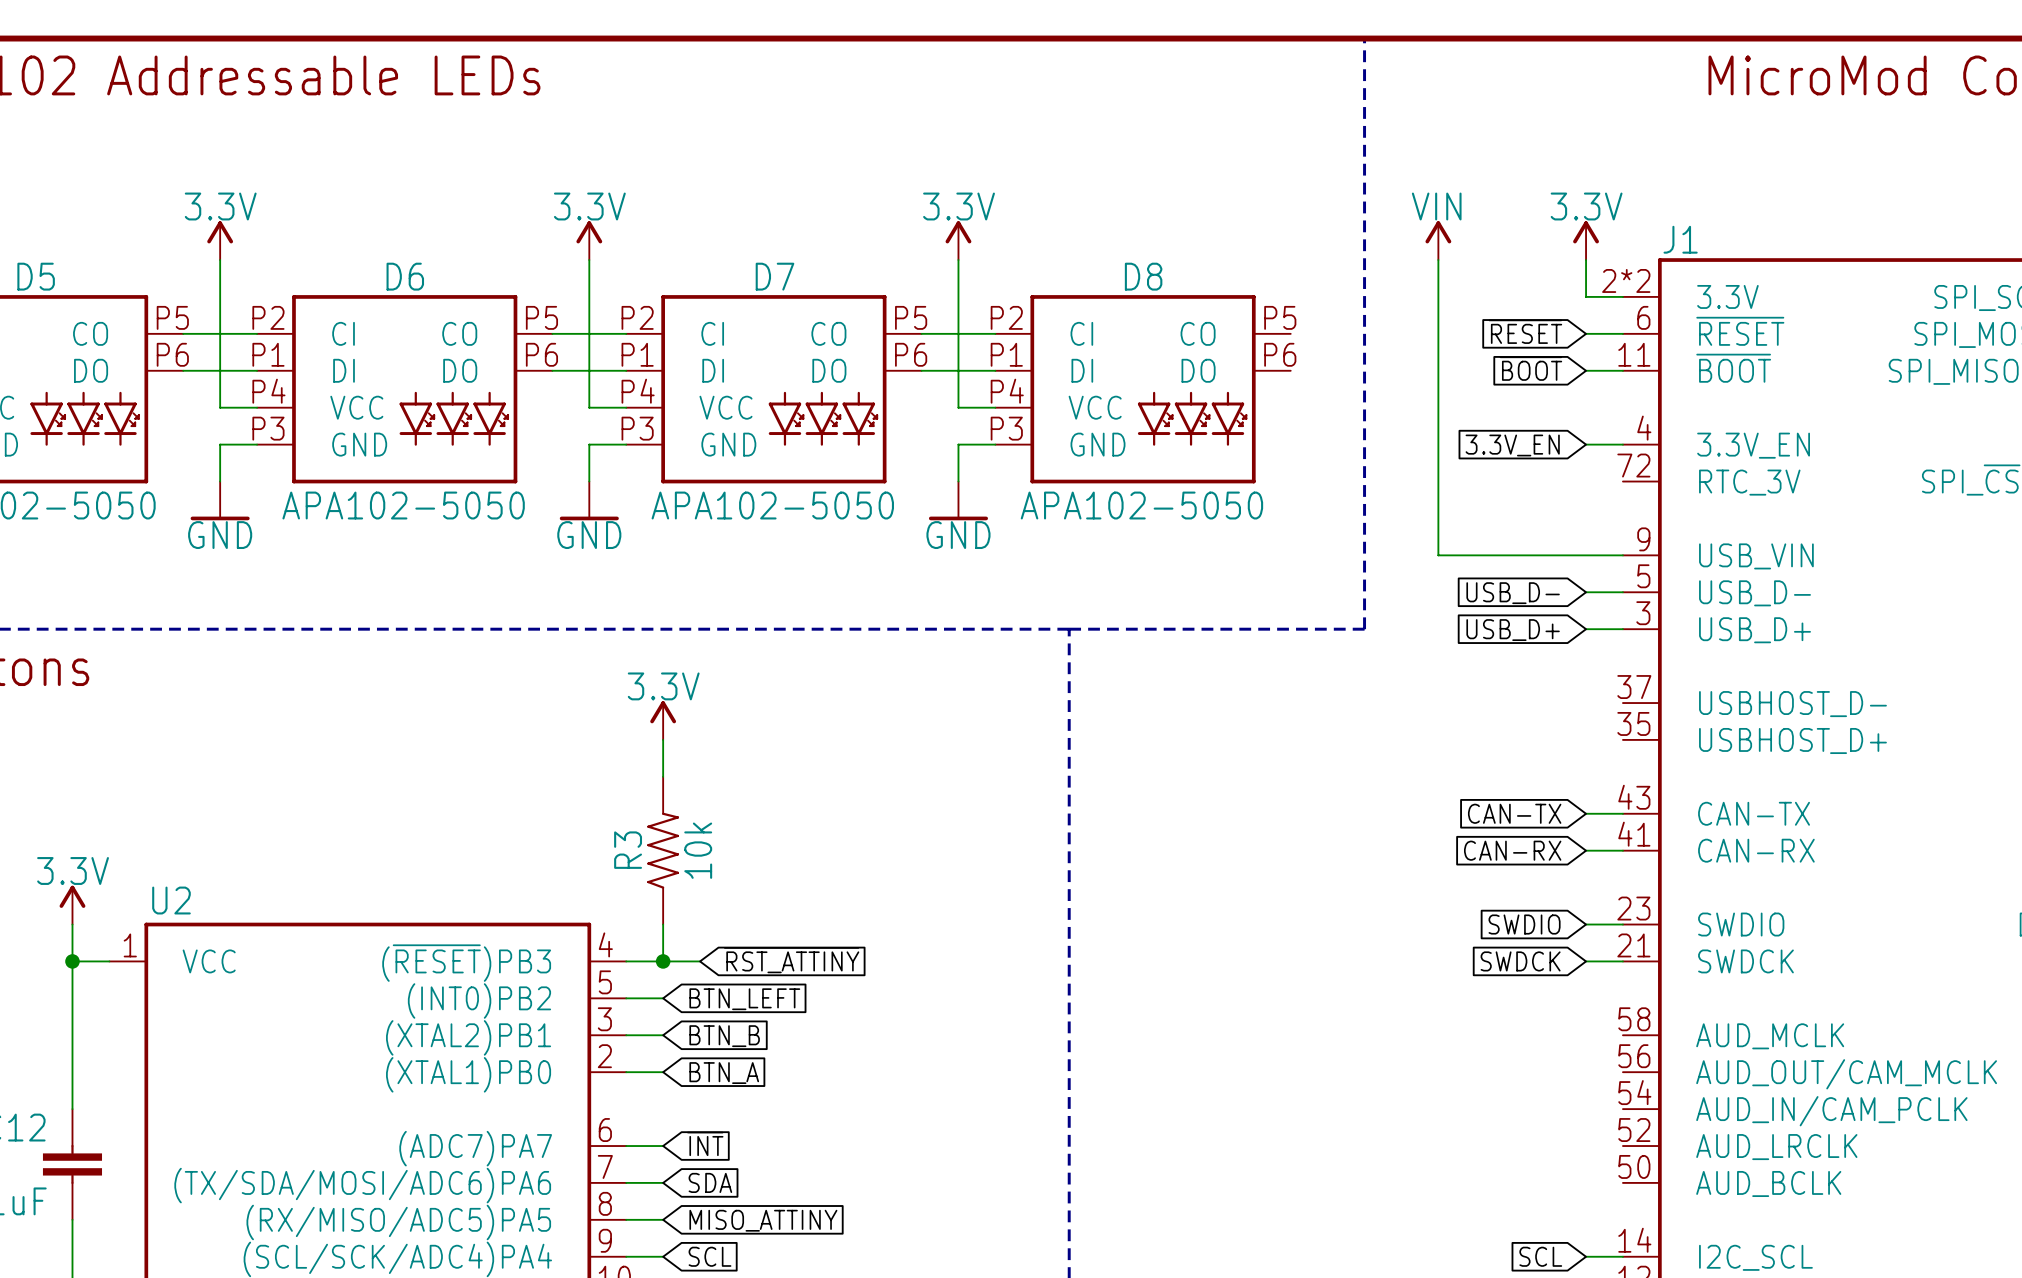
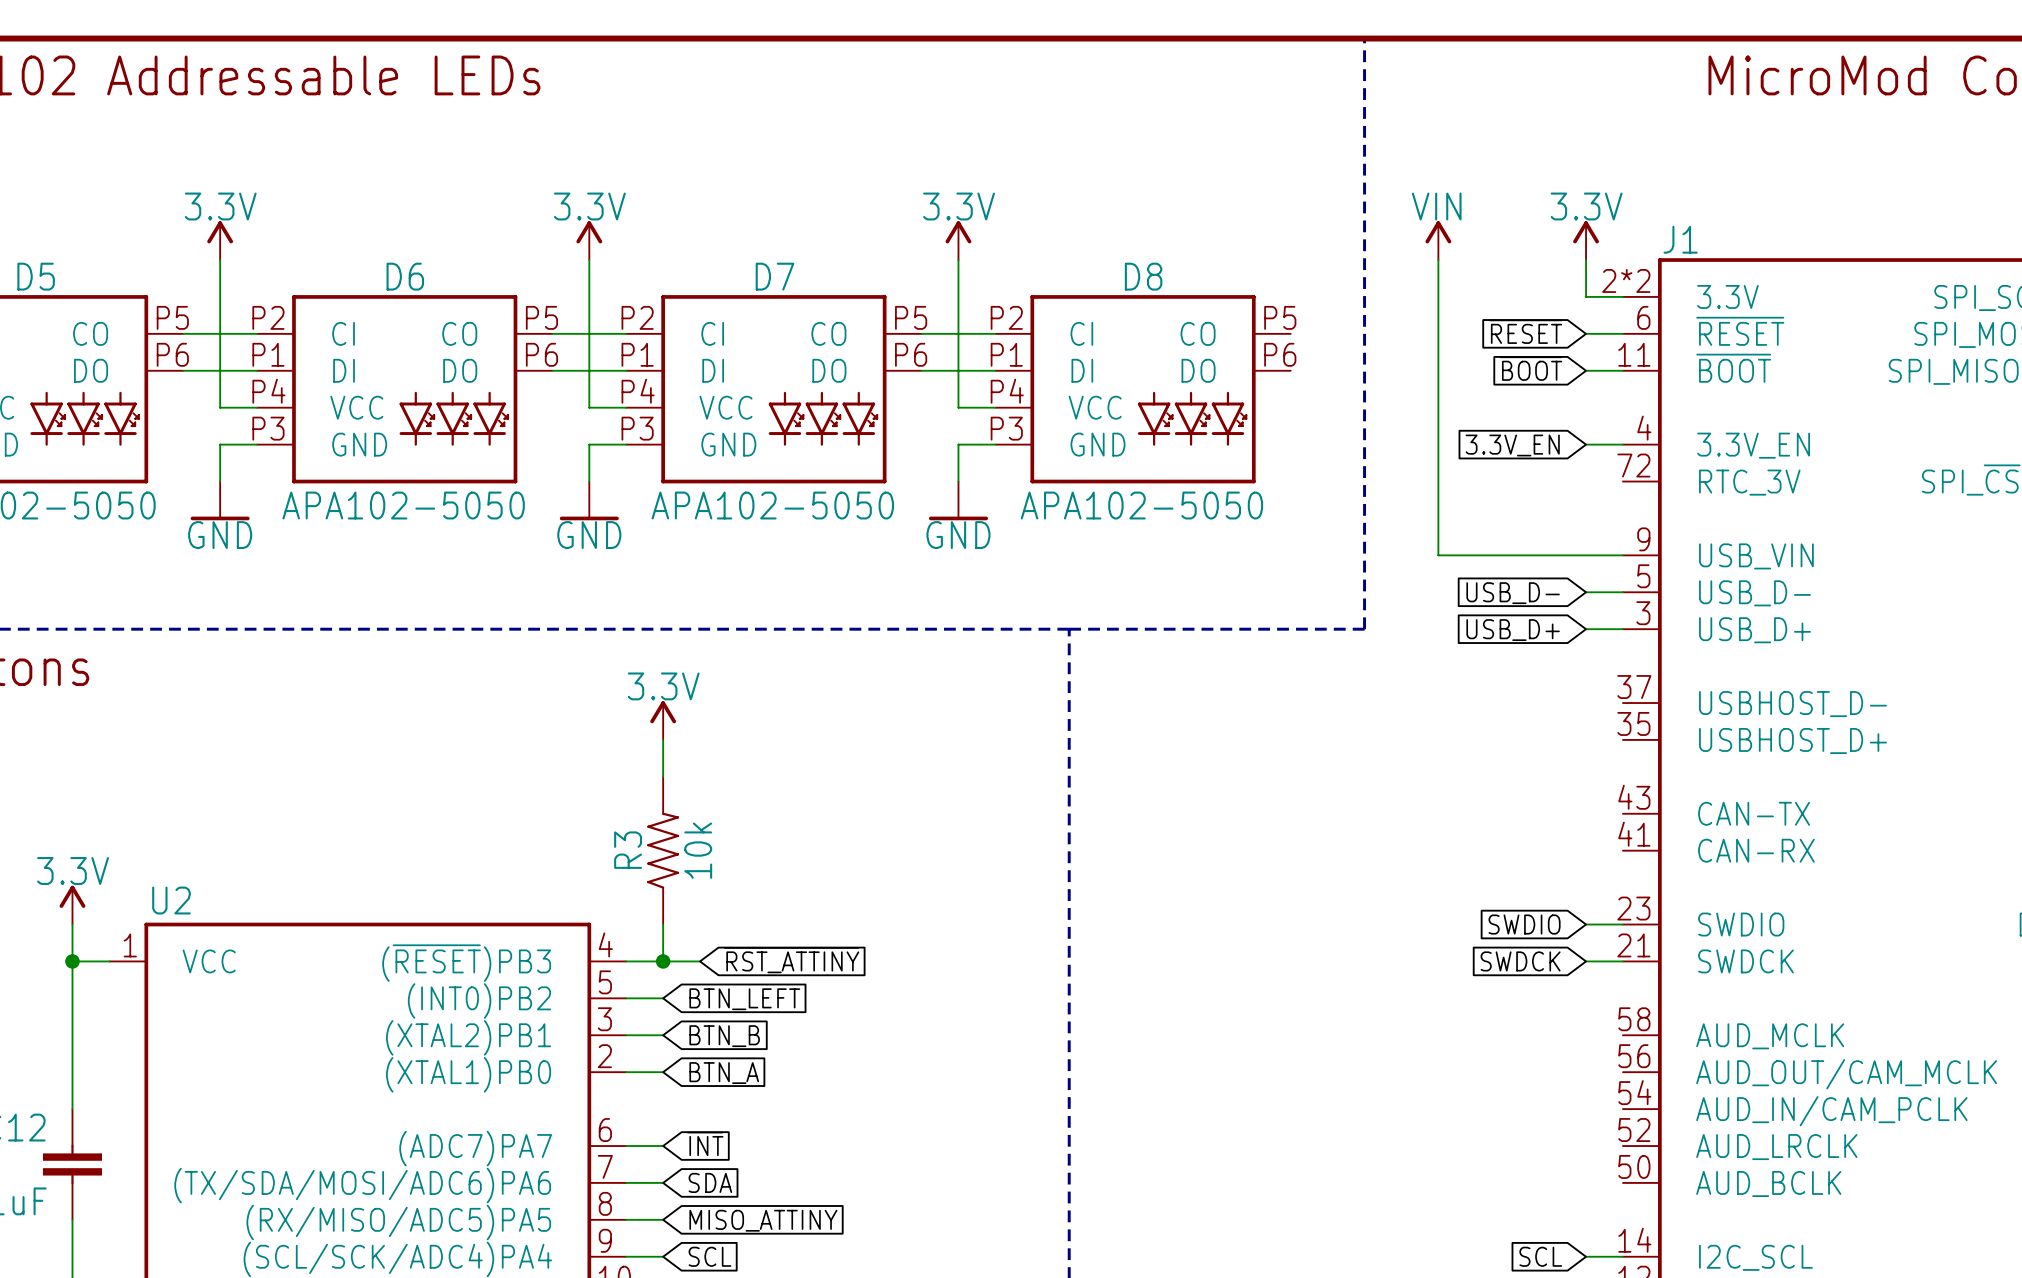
global label: CAN-TX (1514, 813) -> none
wire: (1586, 813) (1622, 813) -> none
global label: CAN-RX (1512, 850) -> none
wire: (1586, 850) (1622, 850) -> none

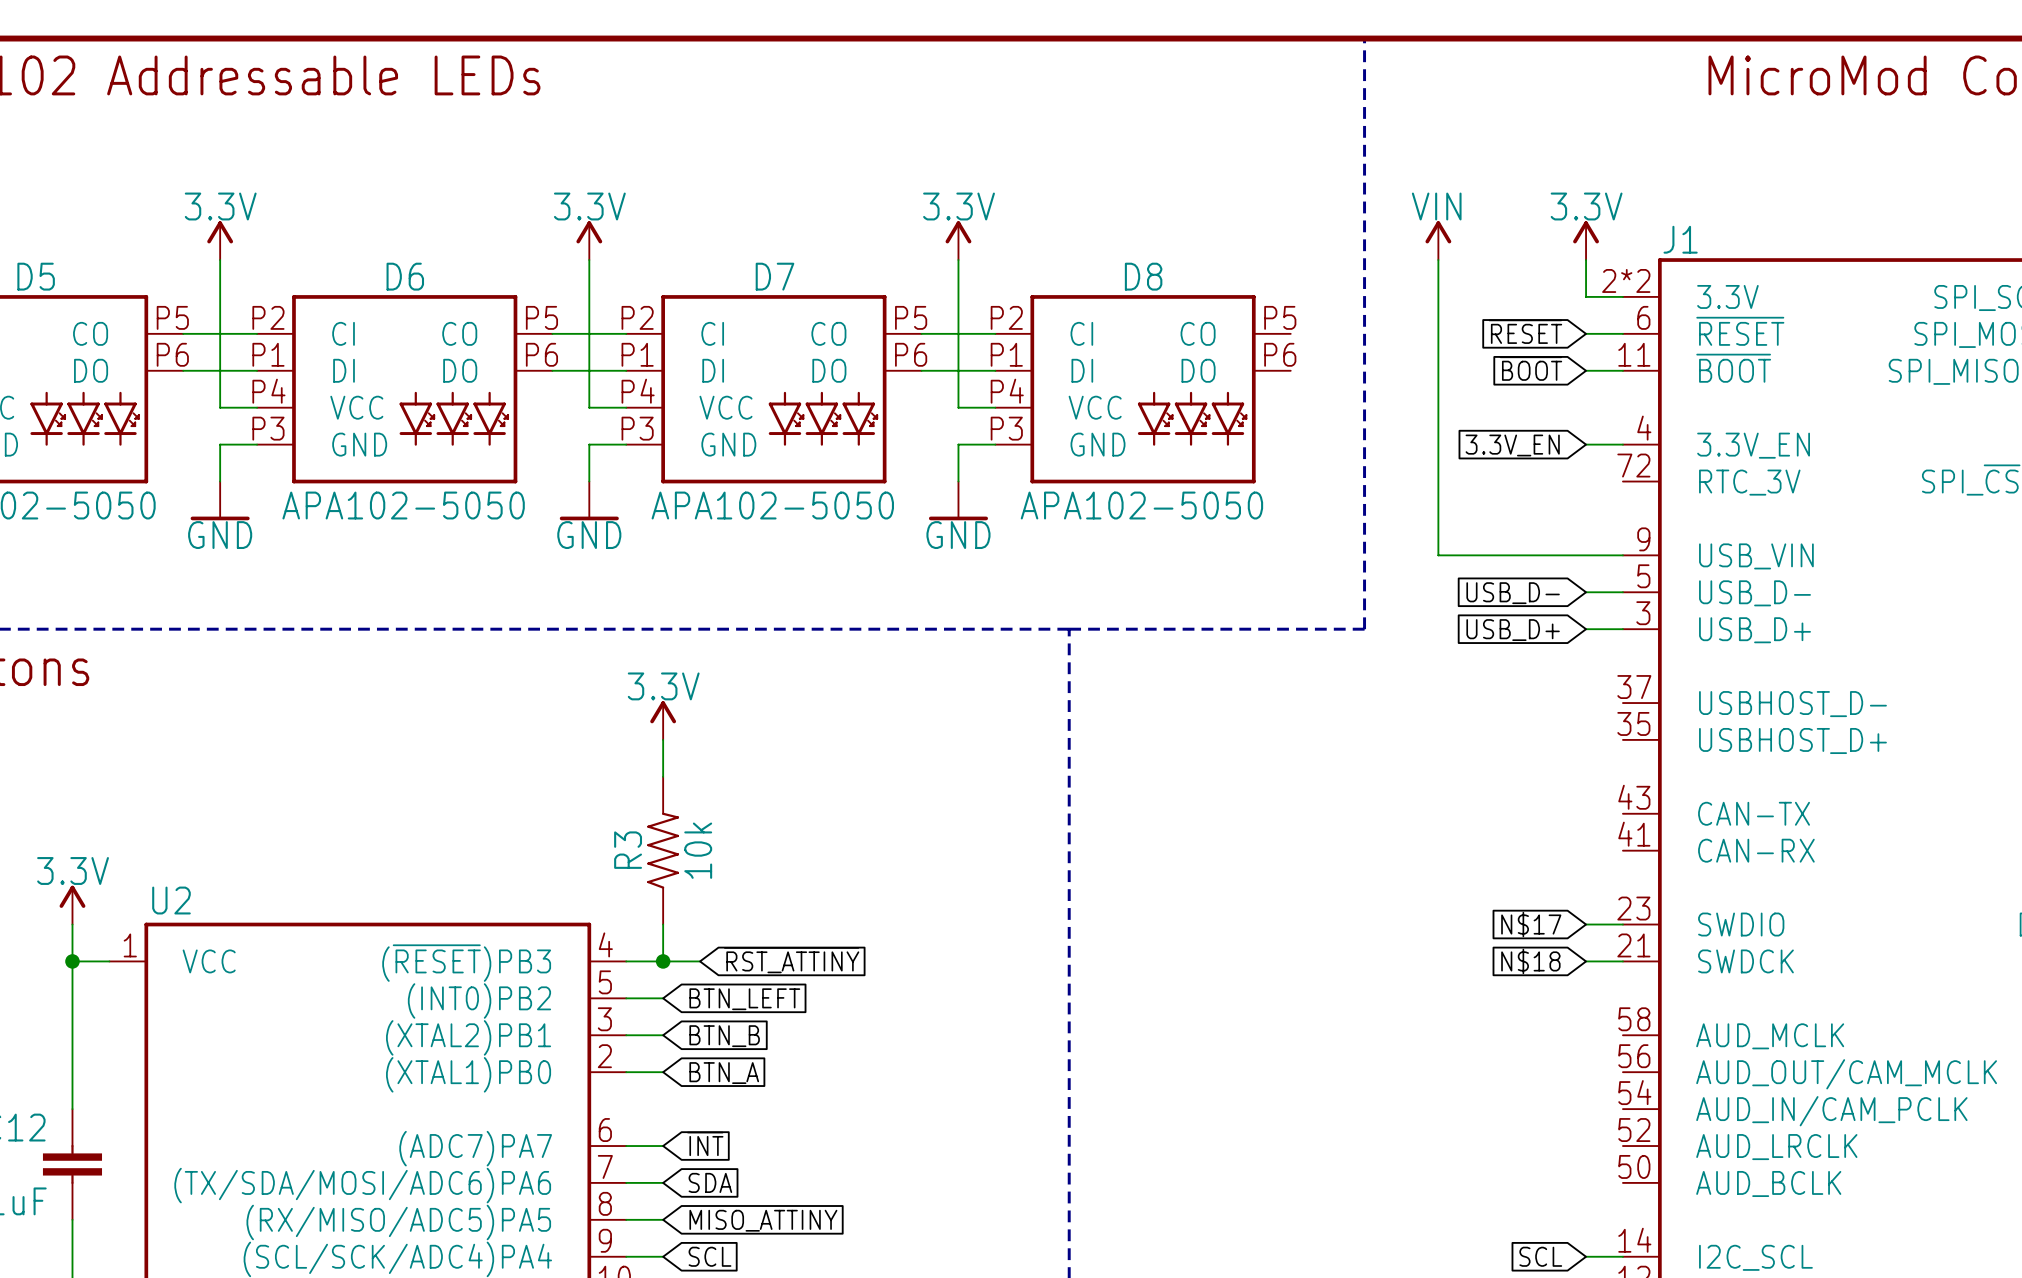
global label: SWDIO (1524, 924) -> N$17 (1531, 924)
global label: SWDCK (1520, 961) -> N$18 (1530, 961)

